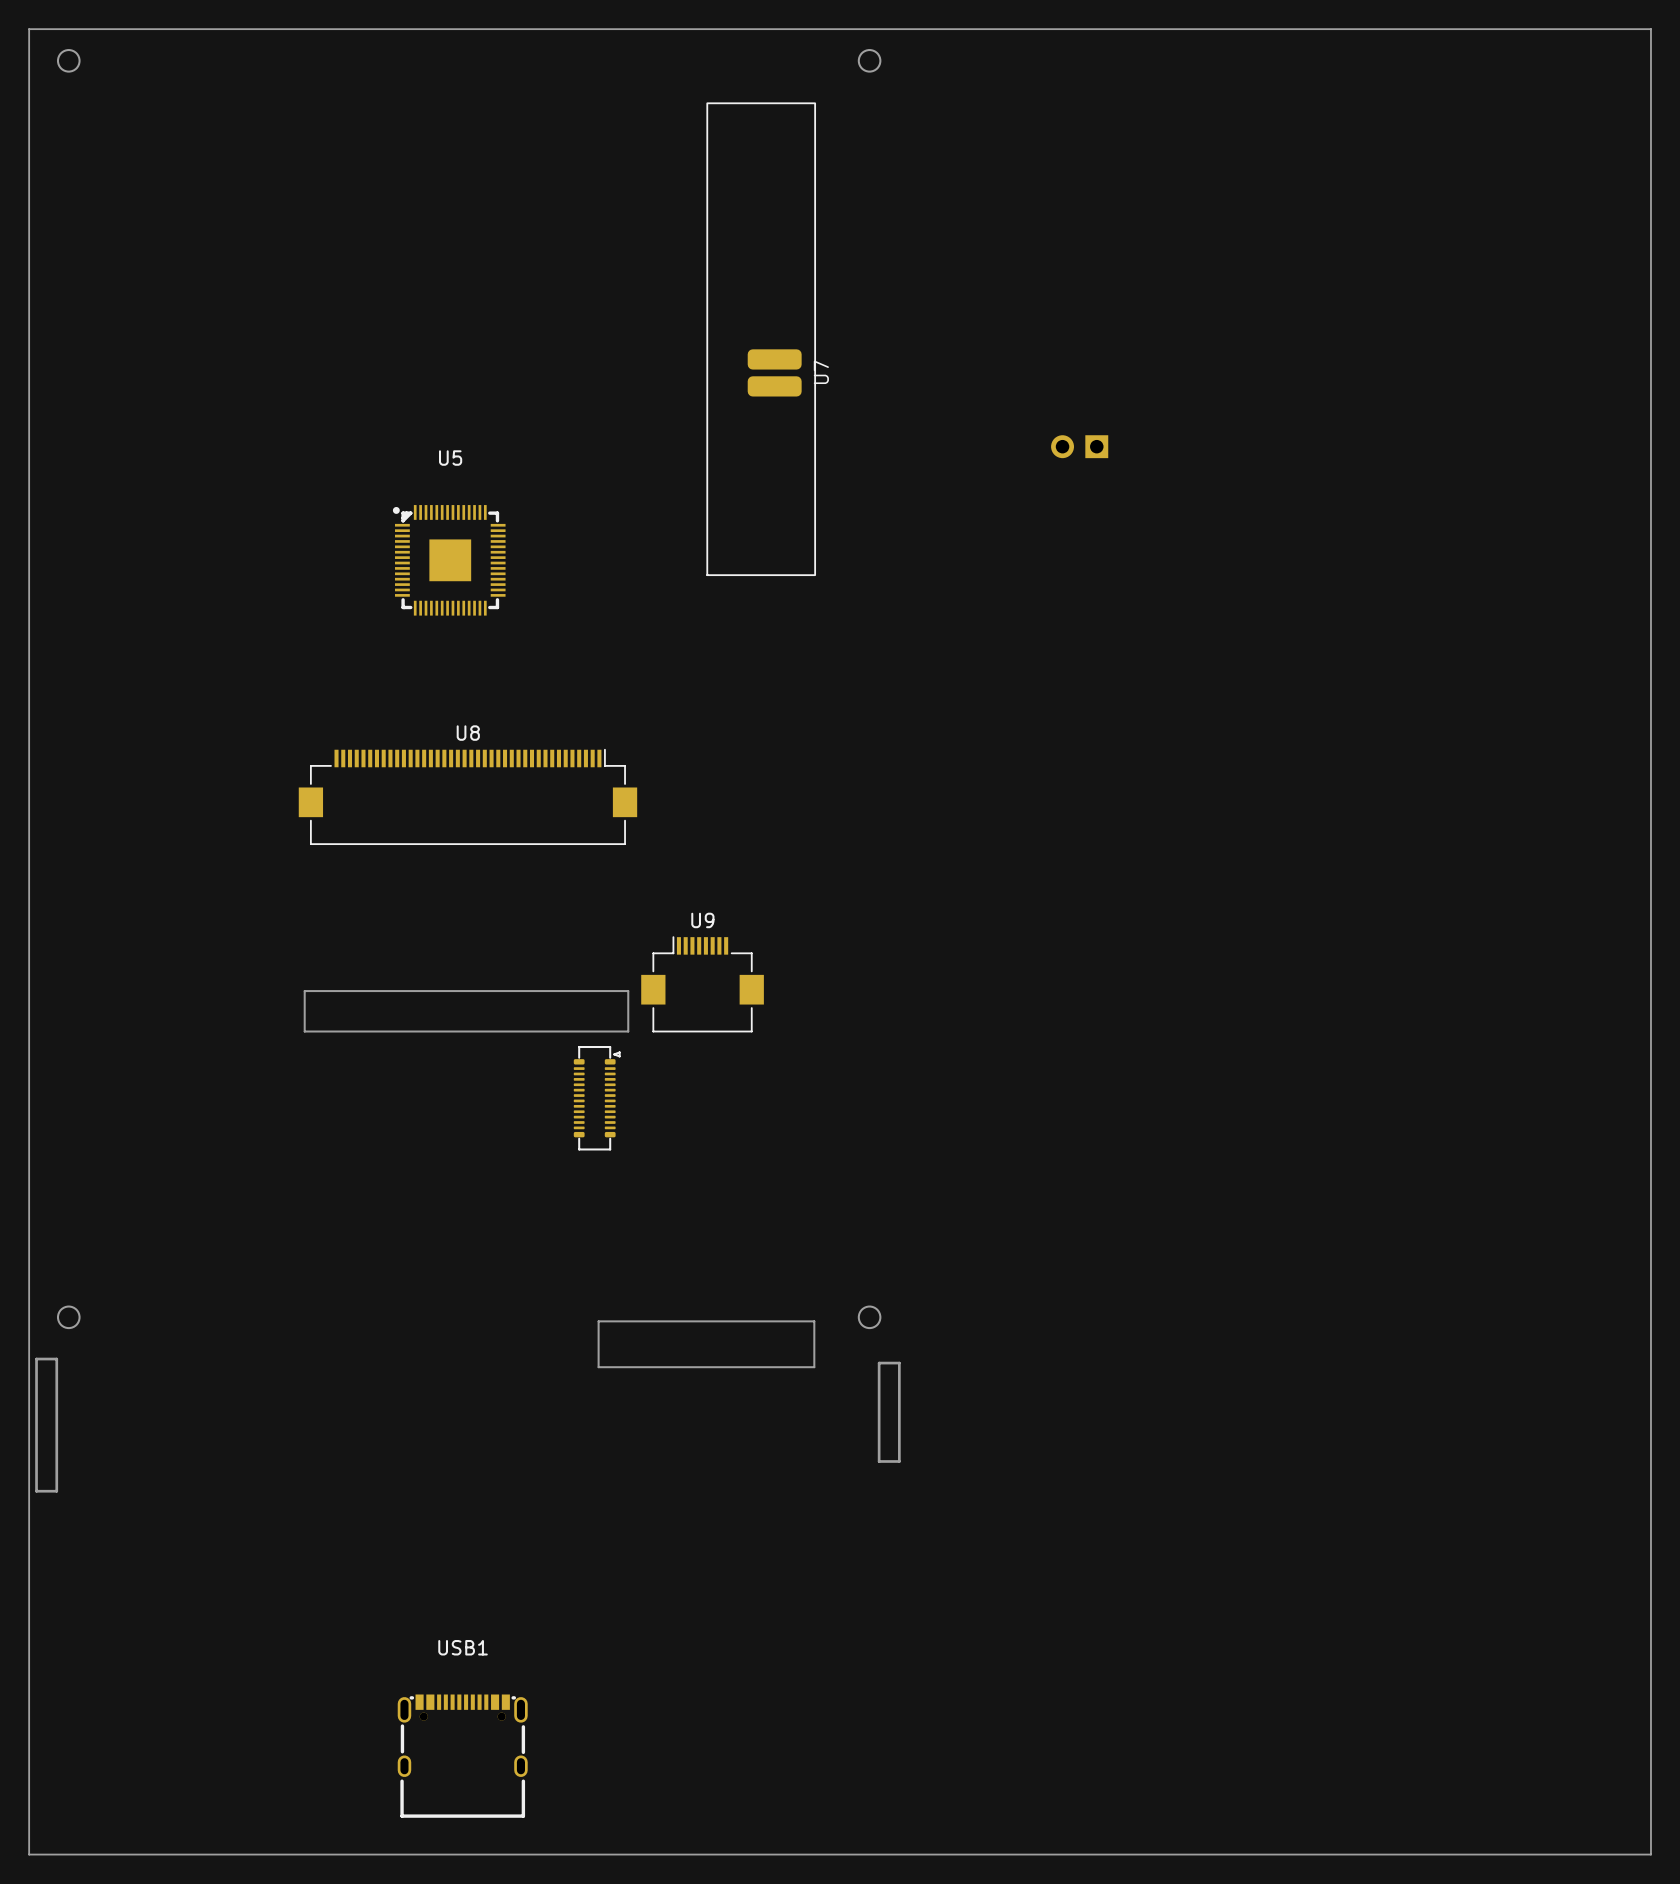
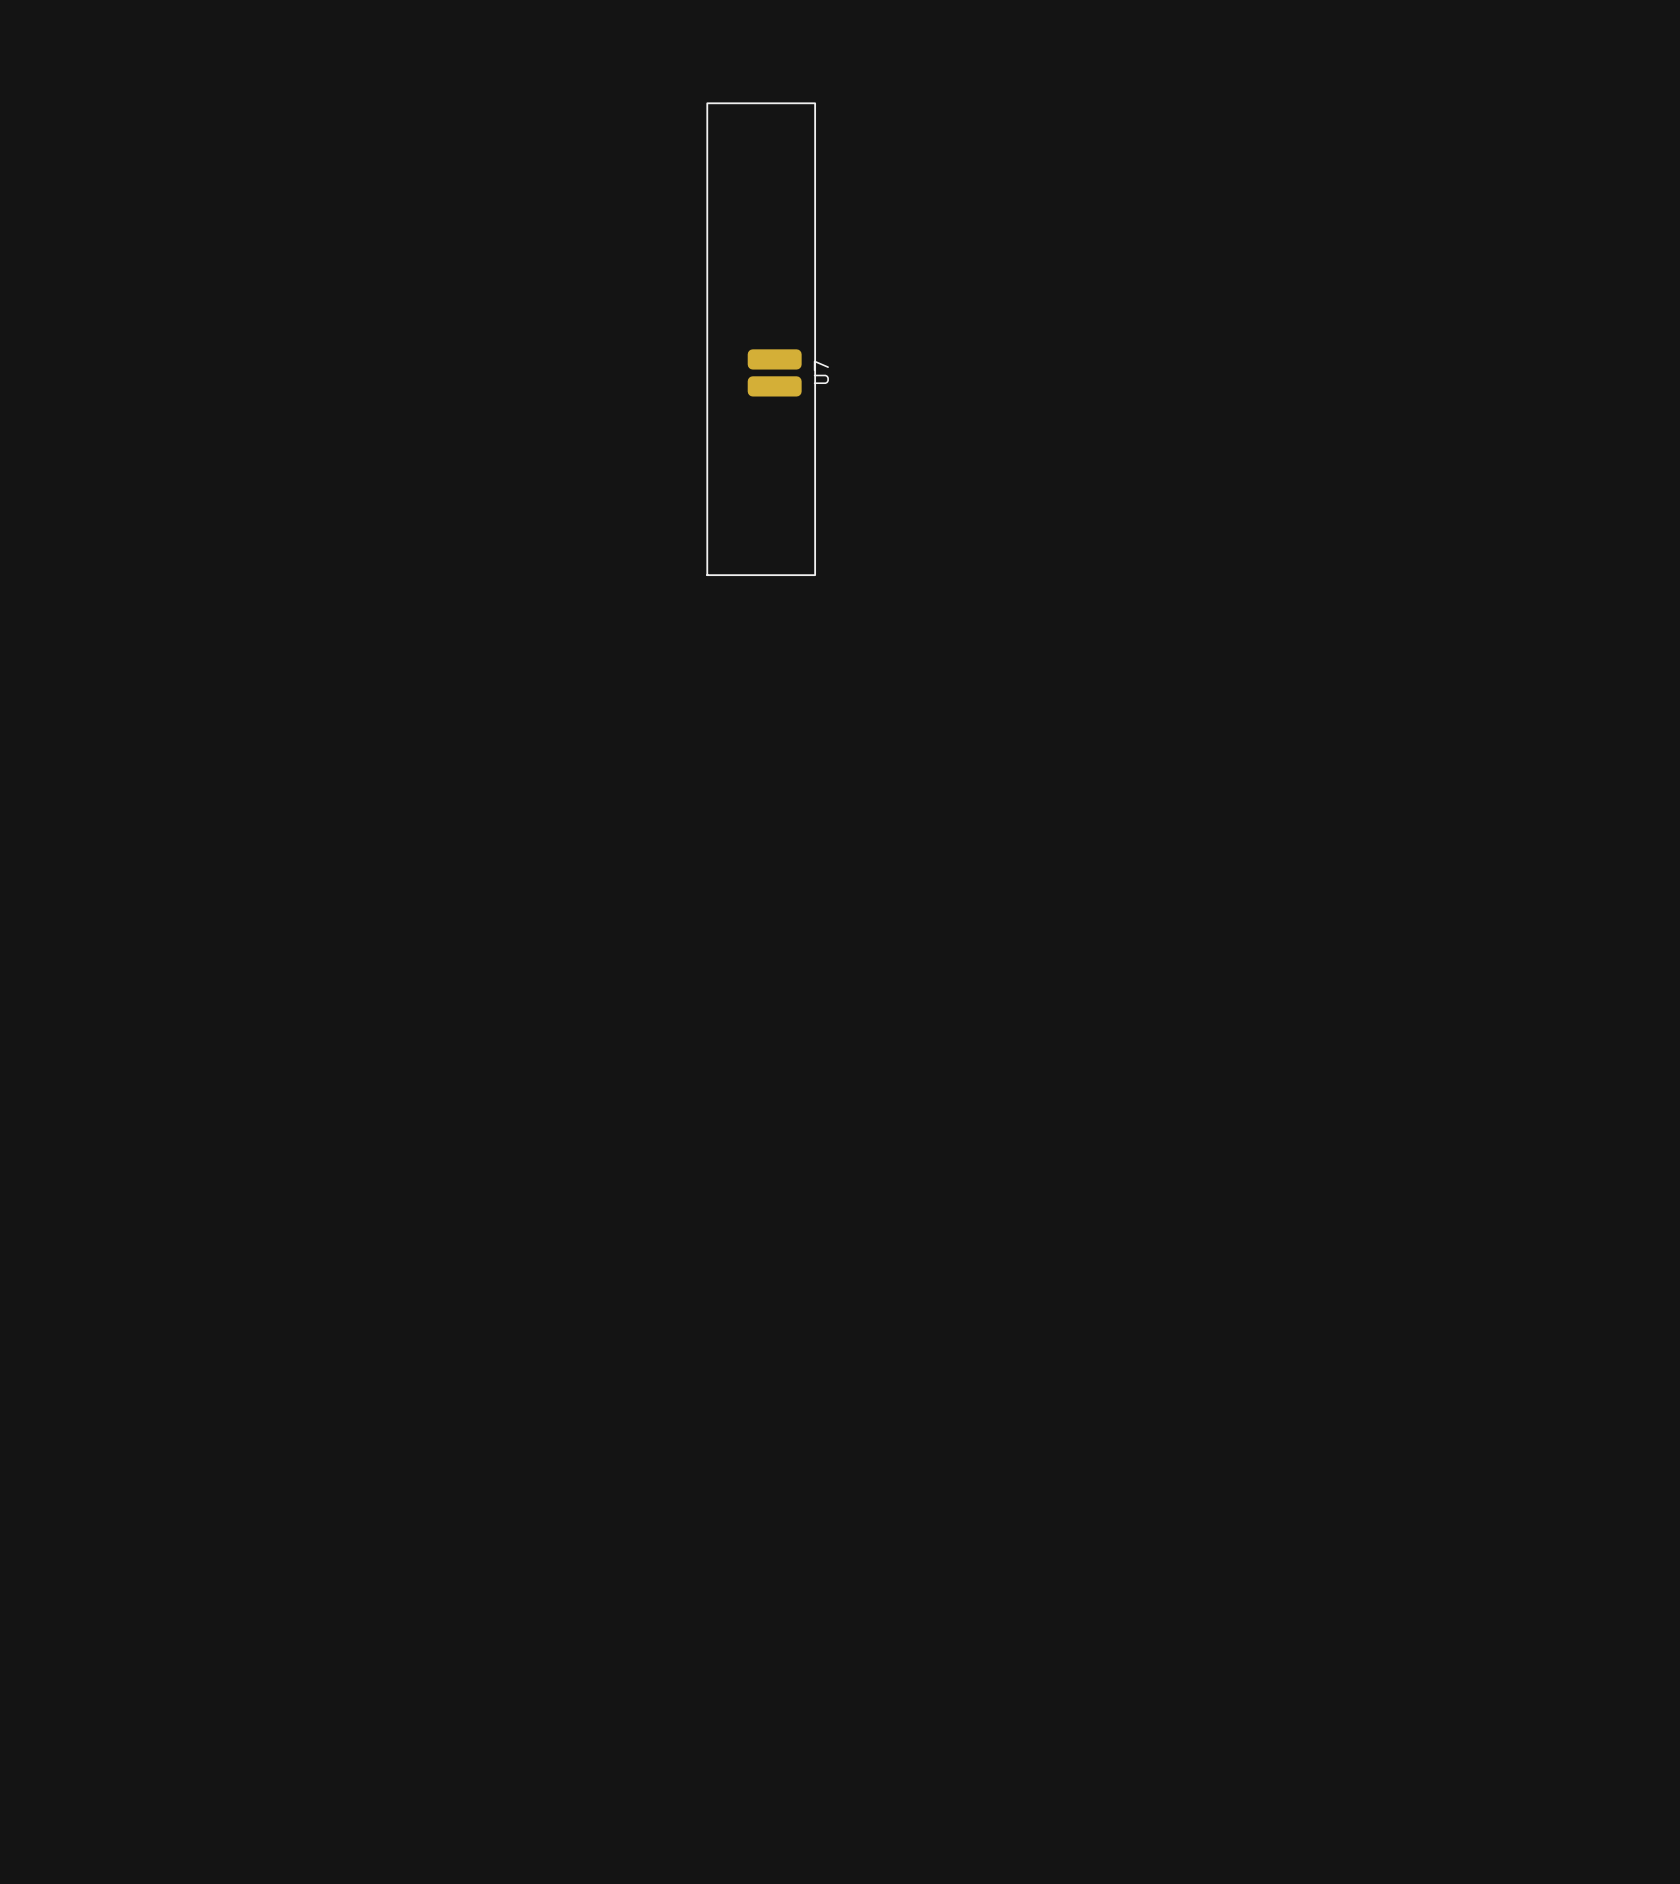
board edge: (1650, 29) (29, 29) (29, 1854) (1650, 1854) (1650, 29) -> none
round board edge: [56, 49, 81, 73] -> none
round board edge: [857, 49, 882, 73] -> none
part: (1079, 446) -> none
U5: (449, 560) -> none
U8: (467, 796) -> none
U9: (702, 984) -> none
board edge: (628, 991) (304, 991) (304, 1031) (628, 1031) (628, 991) -> none
part: (597, 1098) -> none
round board edge: [56, 1305, 81, 1330] -> none
round board edge: [857, 1305, 882, 1330] -> none
board edge: (814, 1321) (598, 1321) (598, 1367) (814, 1367) (814, 1321) -> none
drawing: [35, 1357, 901, 1493] -> none
USB1: (462, 1756) -> none

